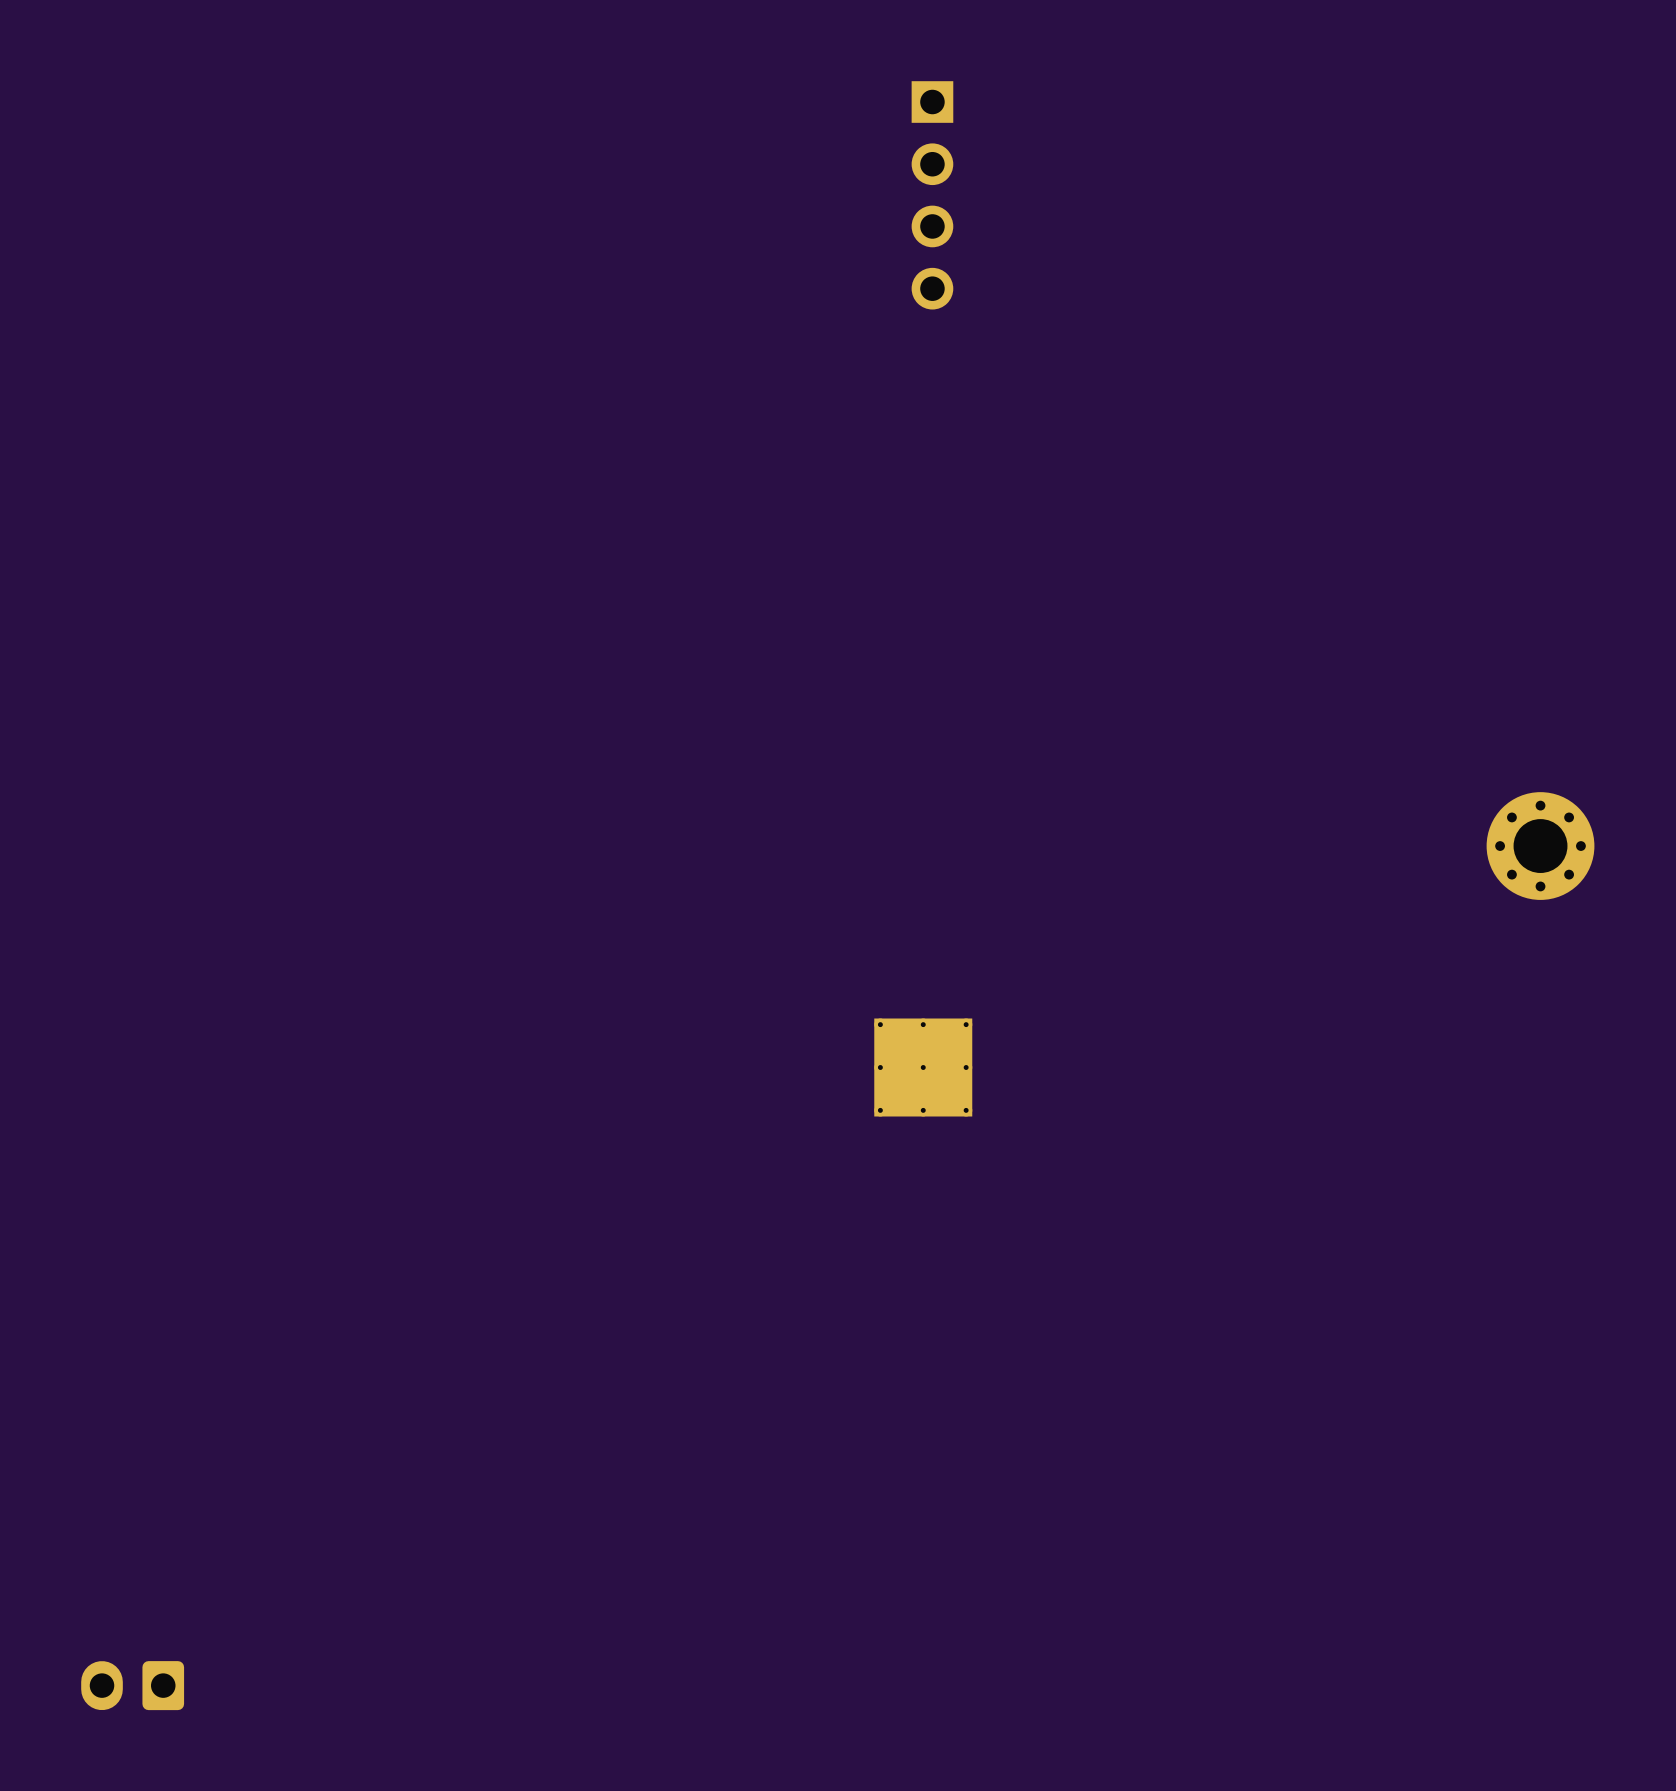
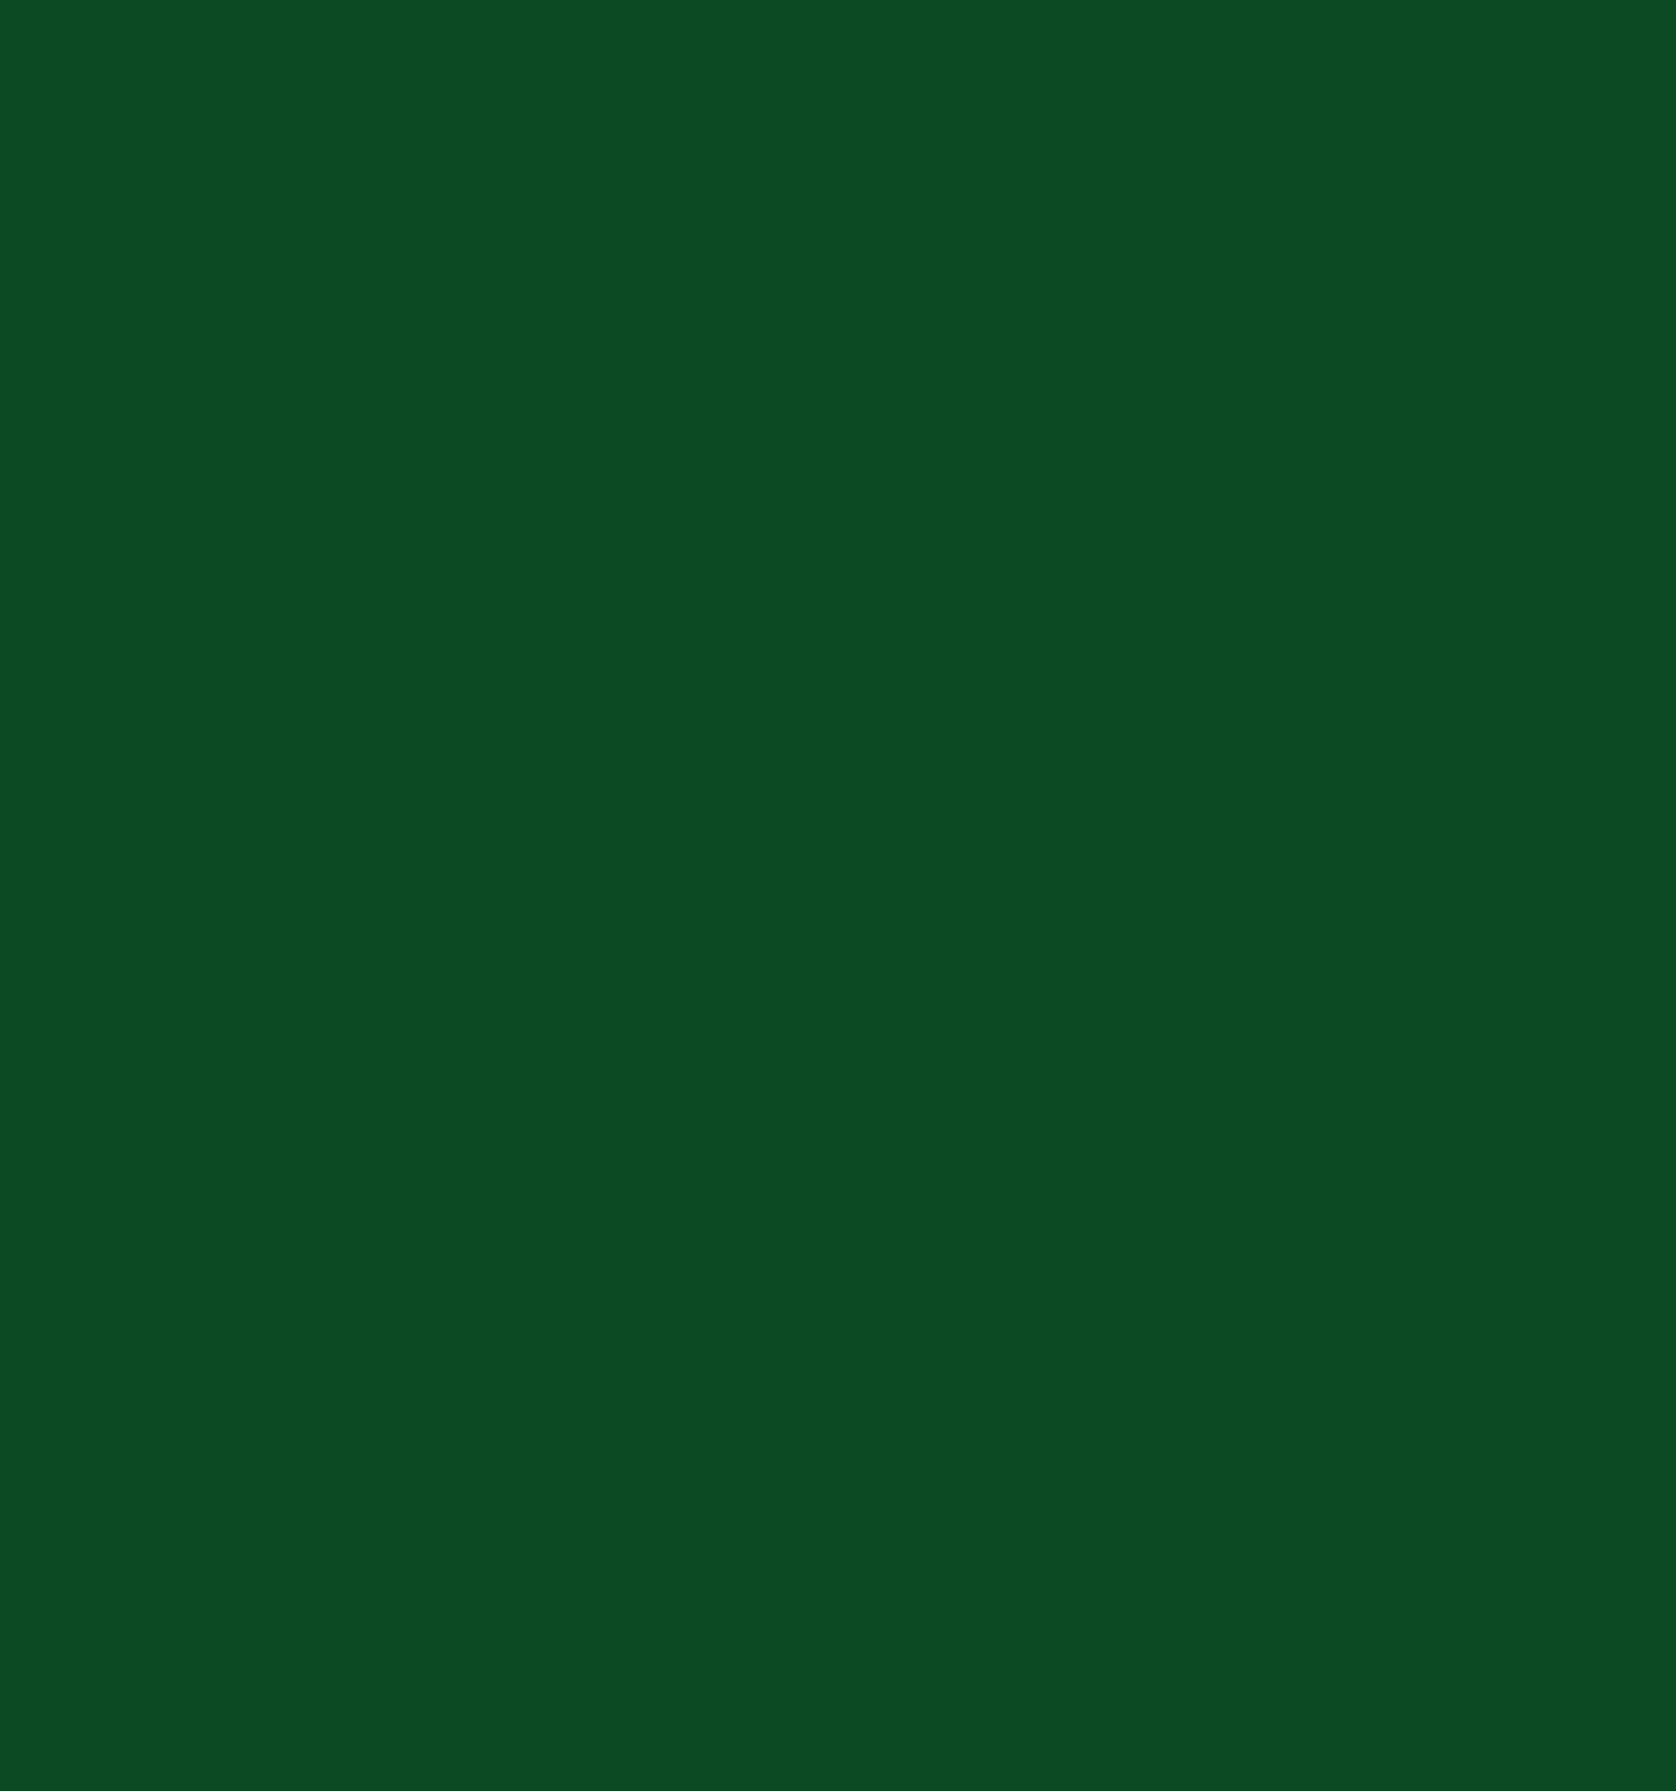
part: (932, 195) -> none
part: (1540, 846) -> none
part: (923, 1067) -> none
part: (132, 1685) -> none

